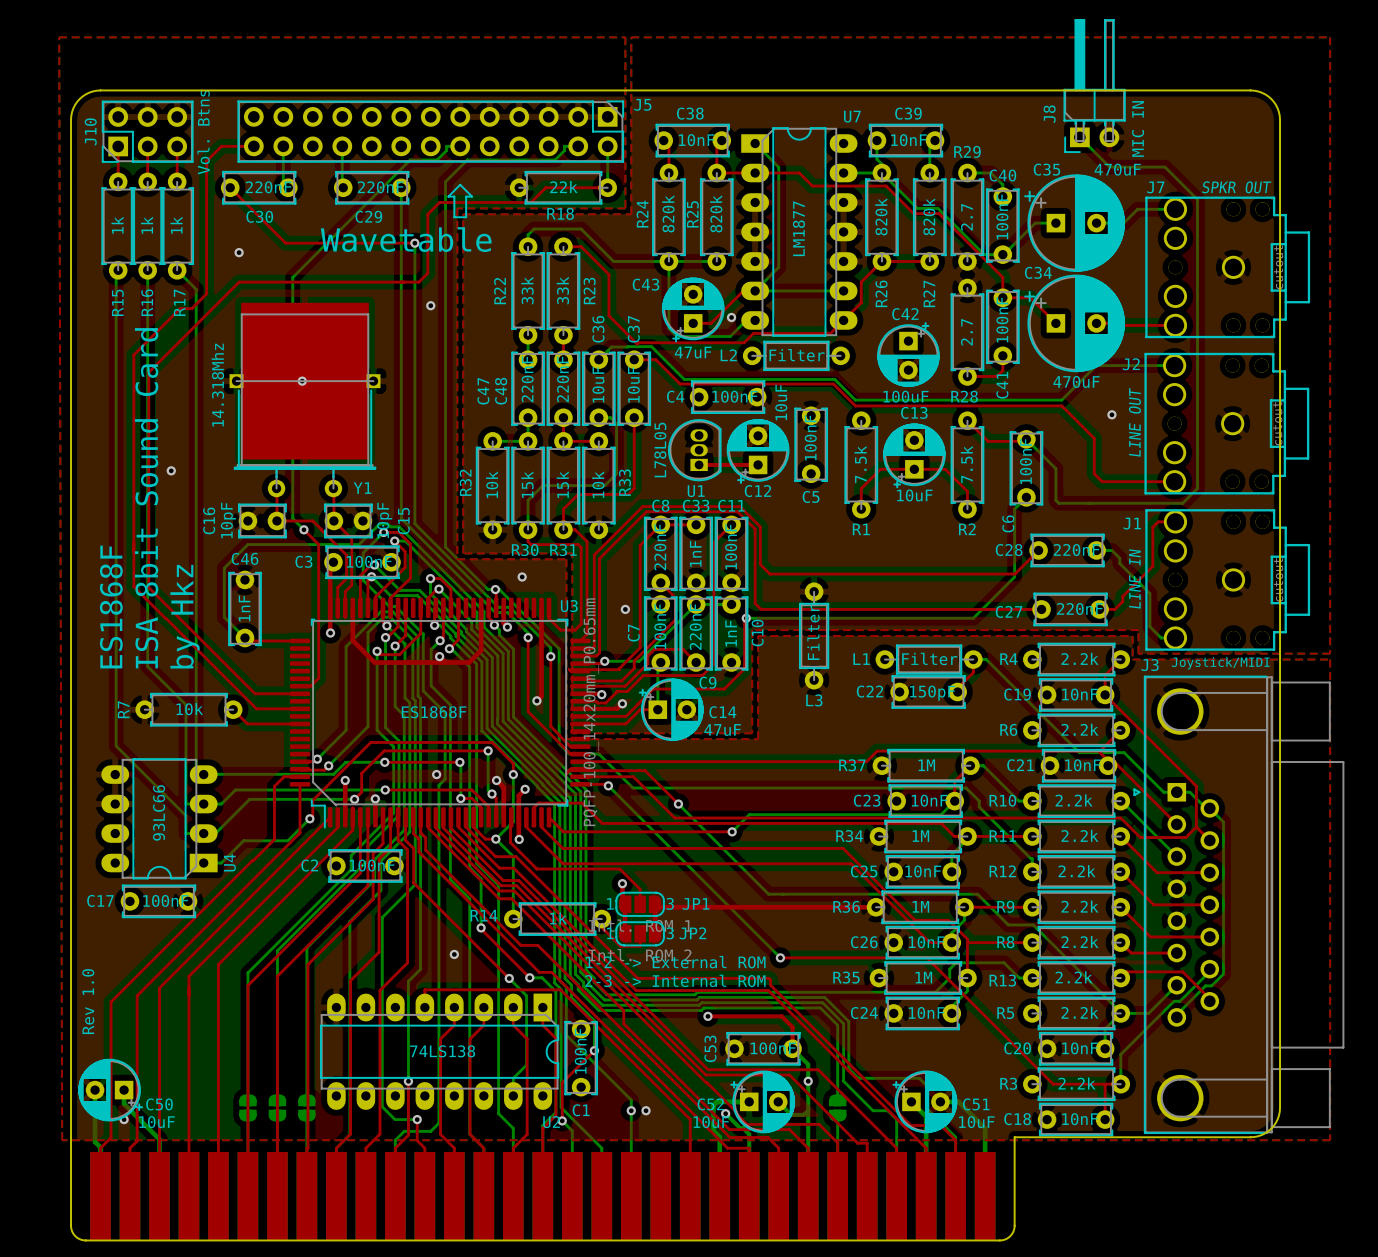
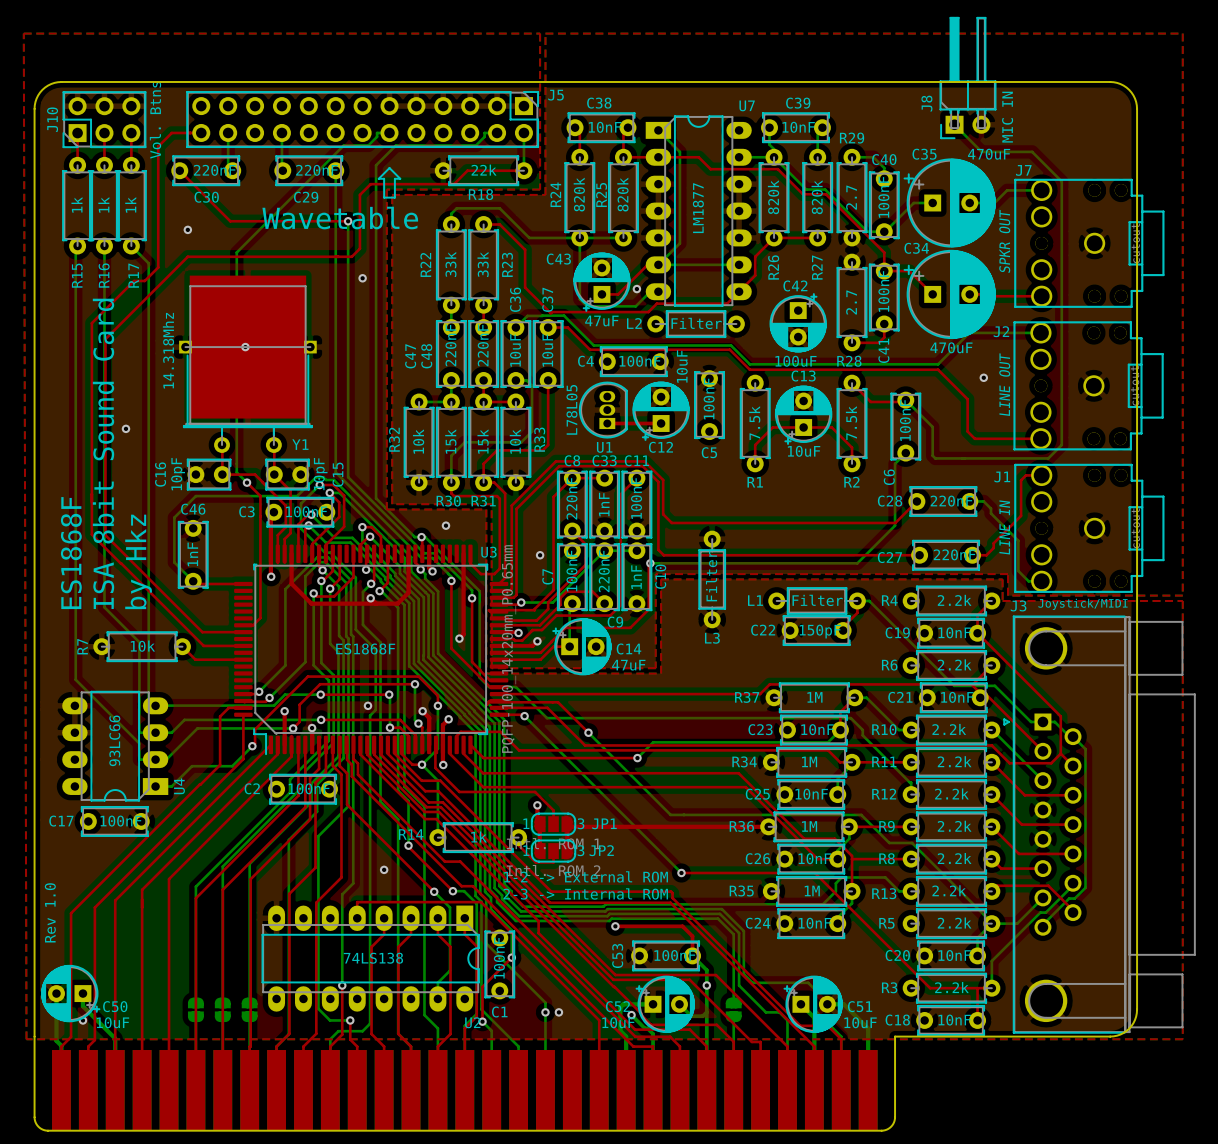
J7 value rotation: 0° (1236, 187) -> 90° counterclockwise (1004, 241)
J7 value position: SPKR OUT (1236, 187) -> SPKR OUT (1004, 241)

